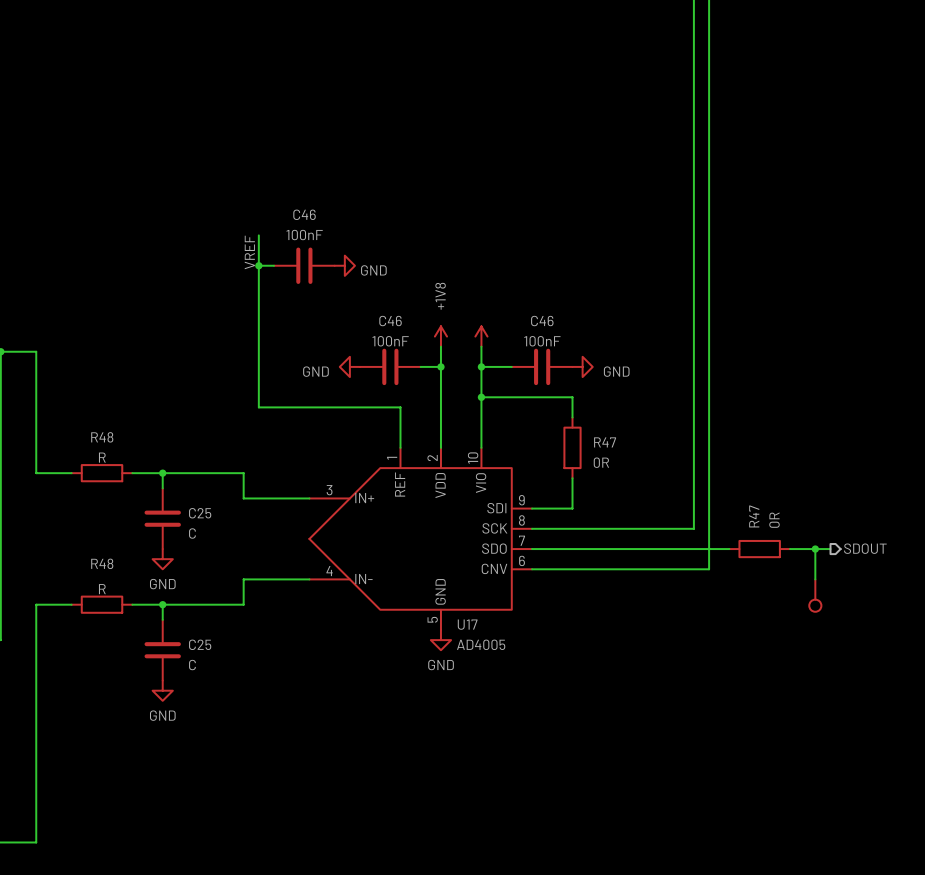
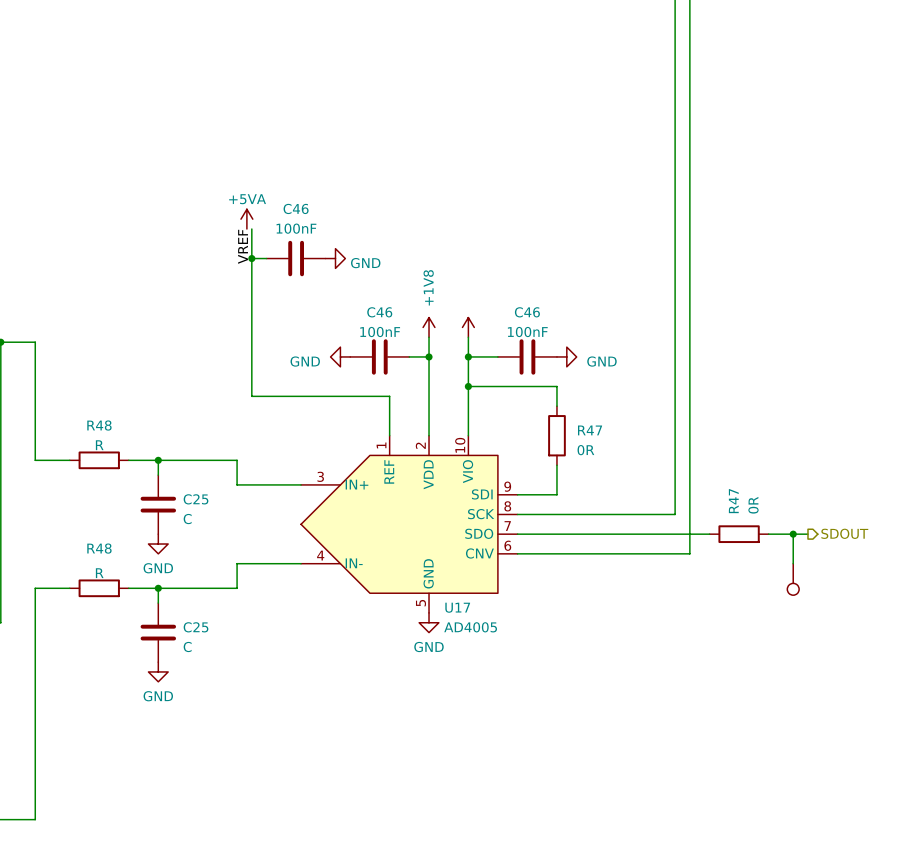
power symbol: none -> +5VA (246, 219)

